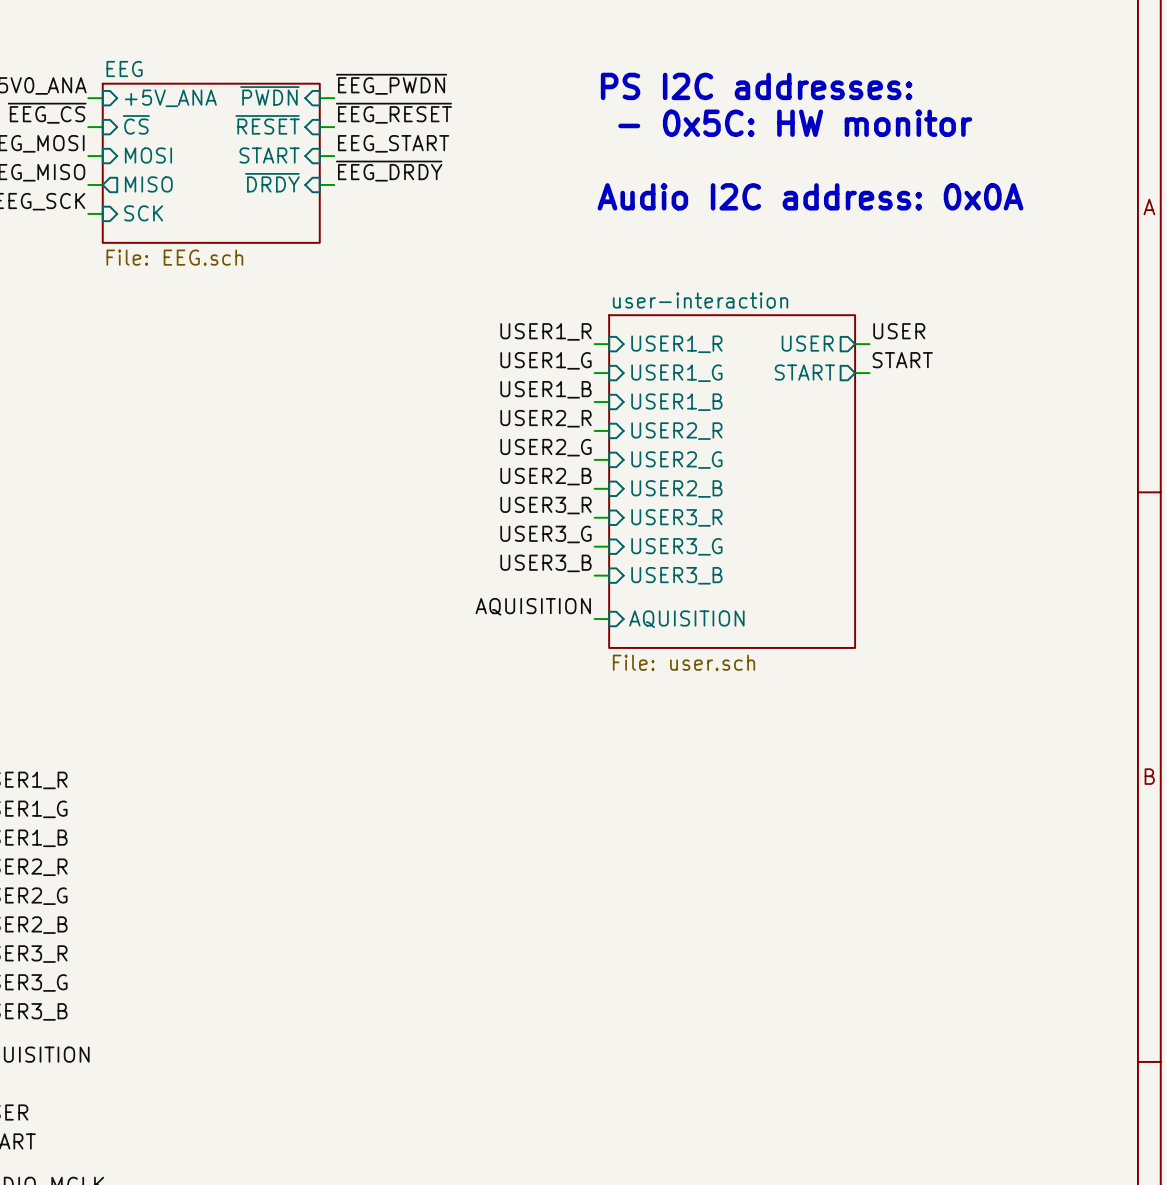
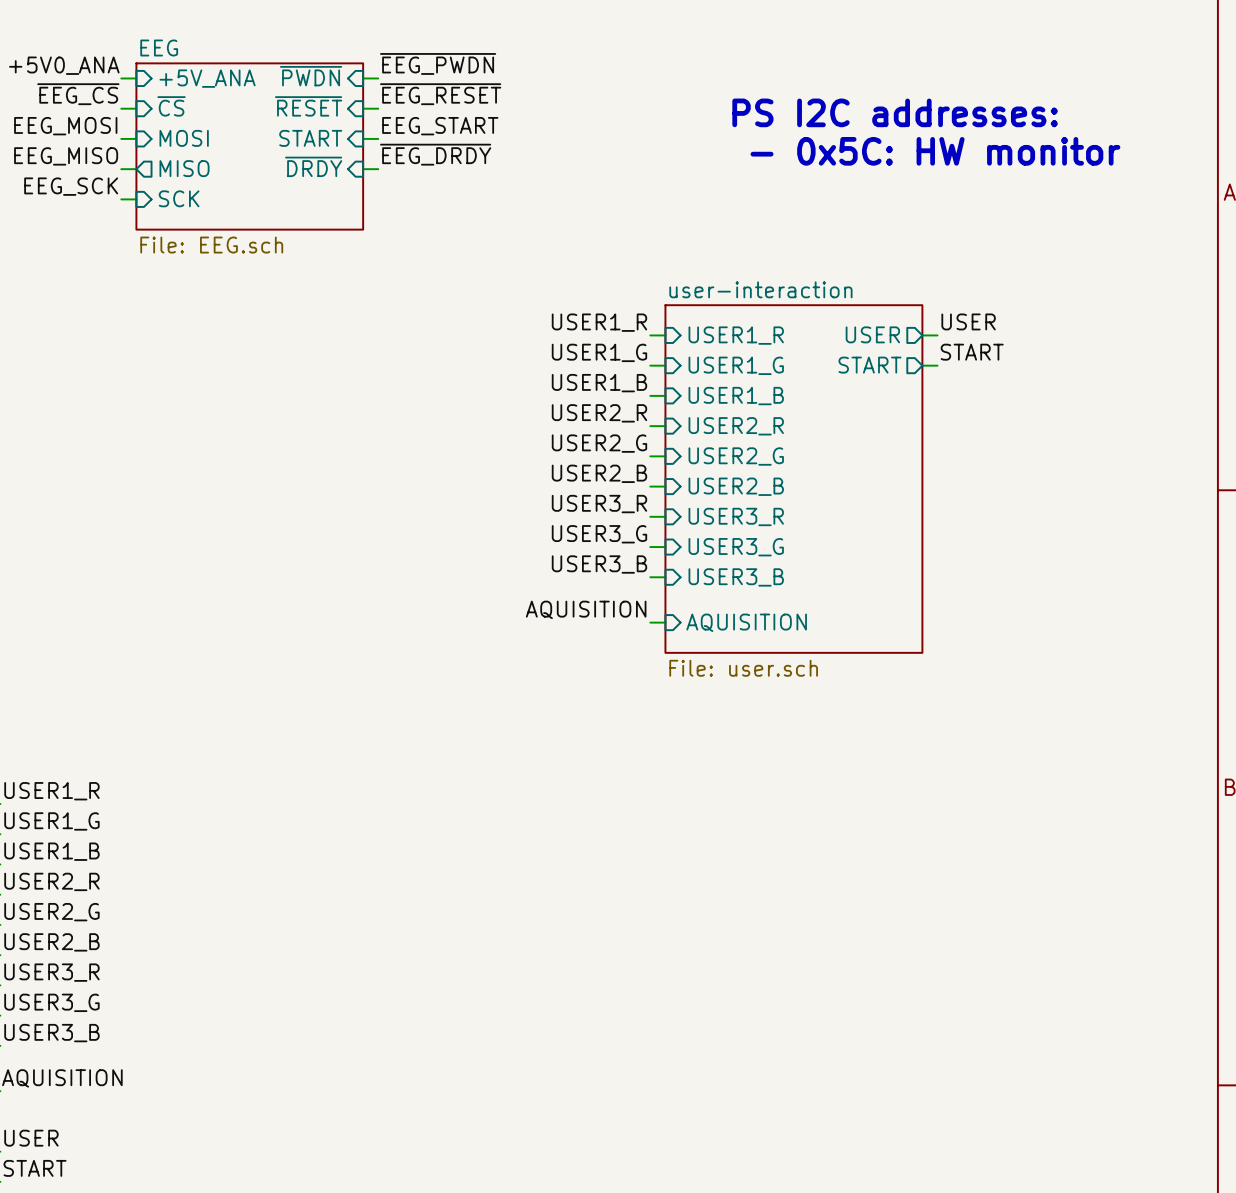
text position: PS I2C addresses: (756, 86) -> PS I2C addresses: (895, 112)
text position: - 0x5C: HW monitor (795, 123) -> - 0x5C: HW monitor (935, 151)
text: Audio I2C address: 0x0A (810, 196) -> none

